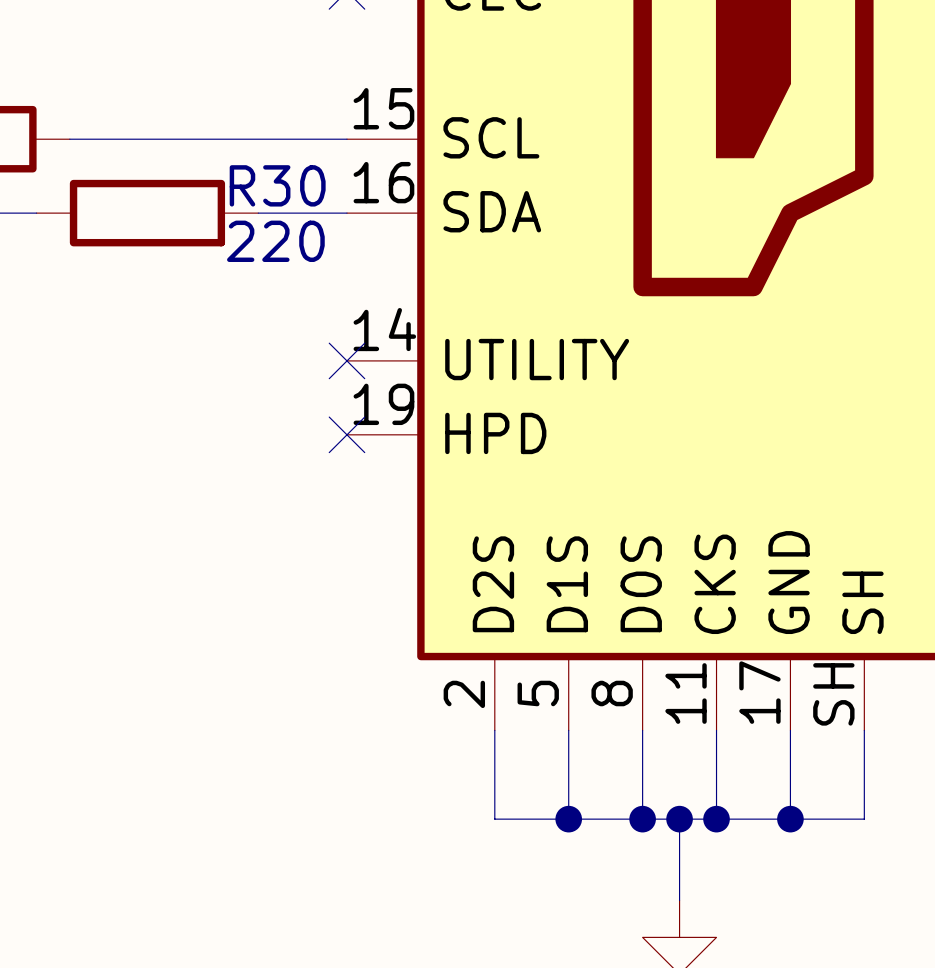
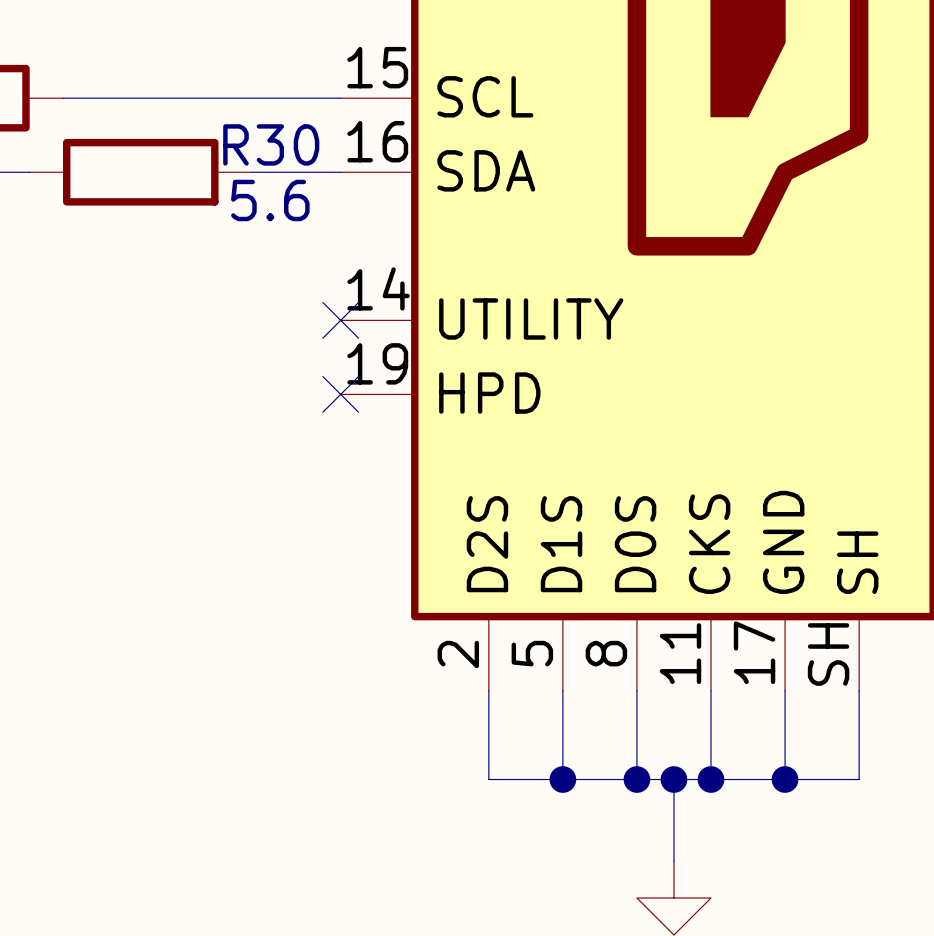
R30 value: 220 (275, 241) -> 5.6 (270, 200)

